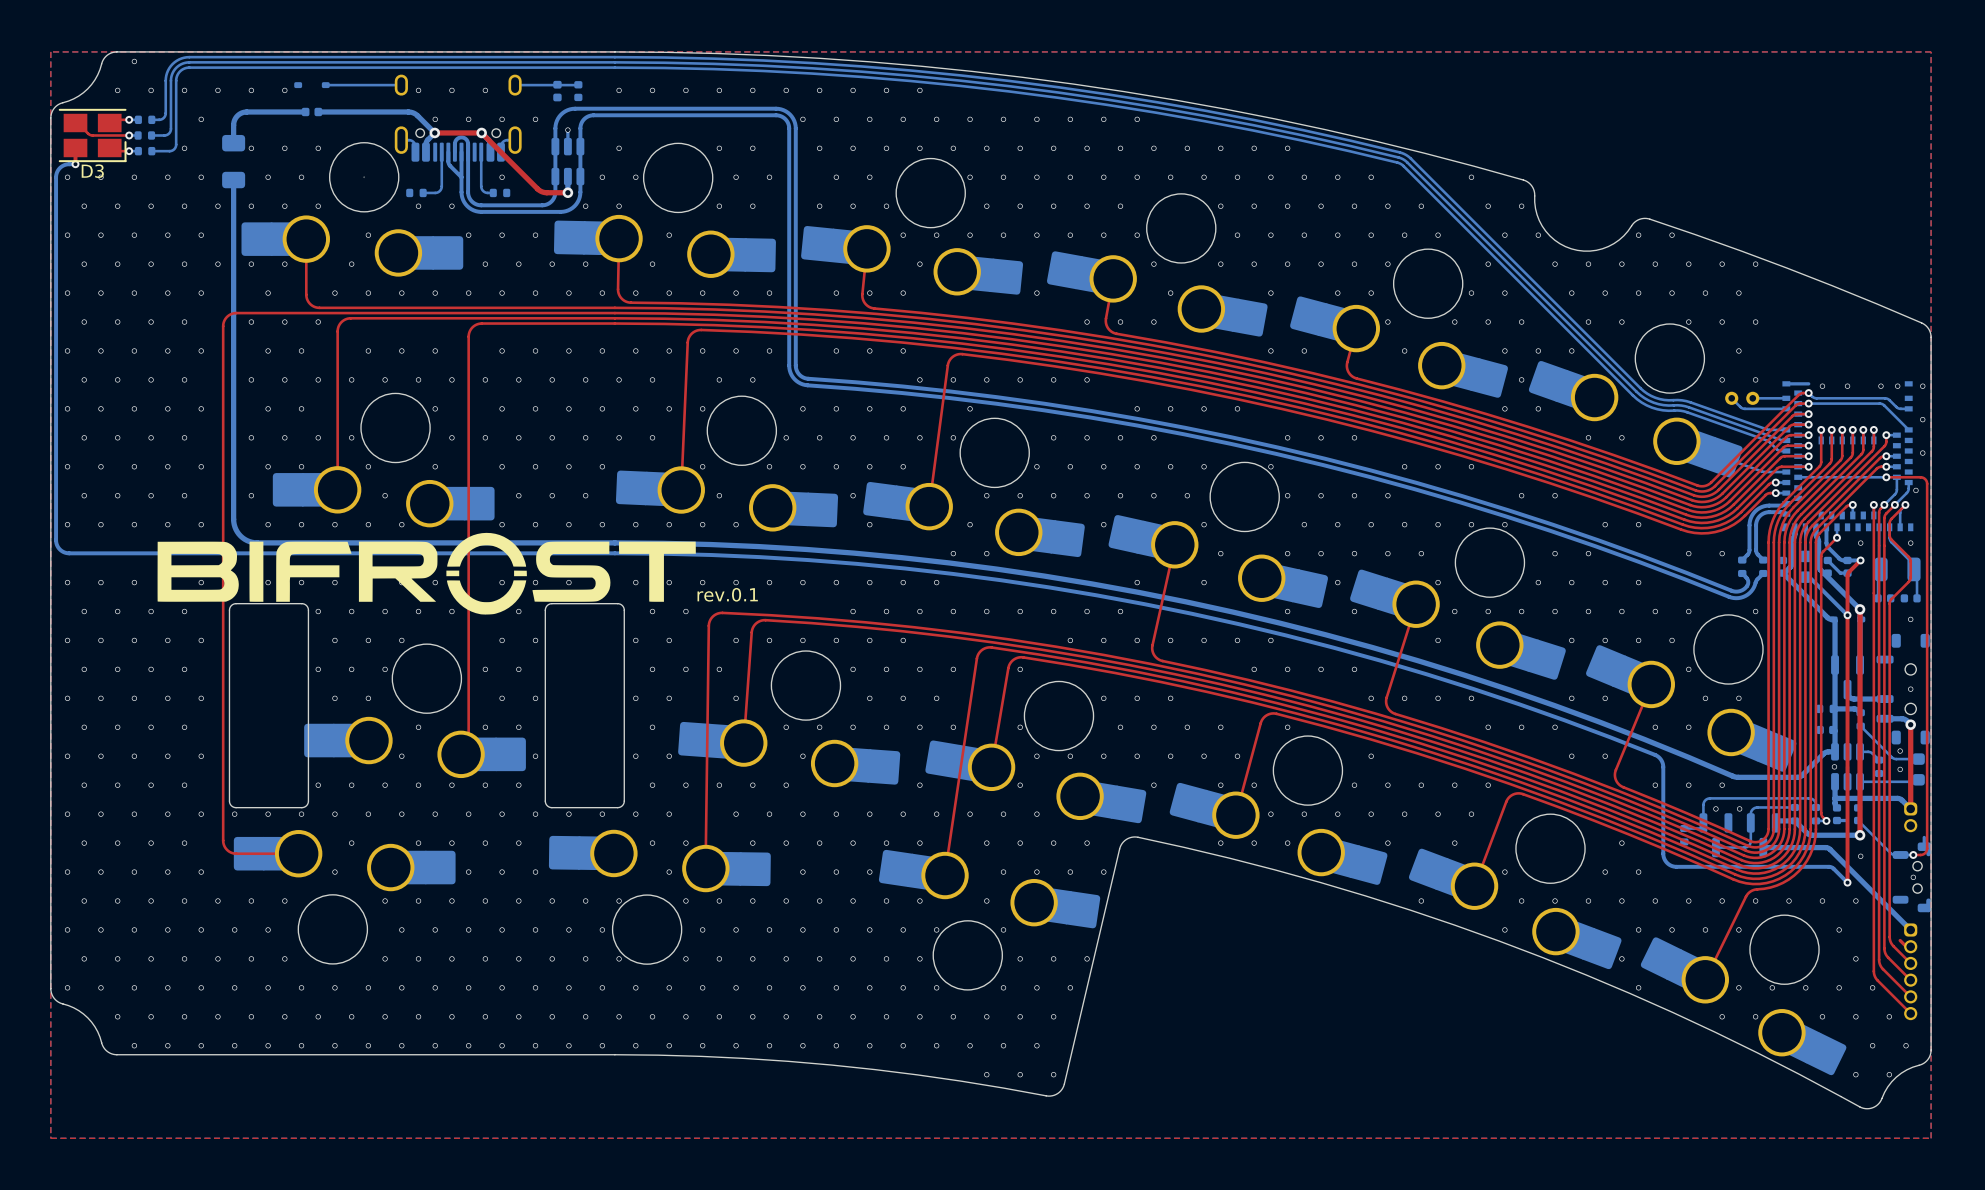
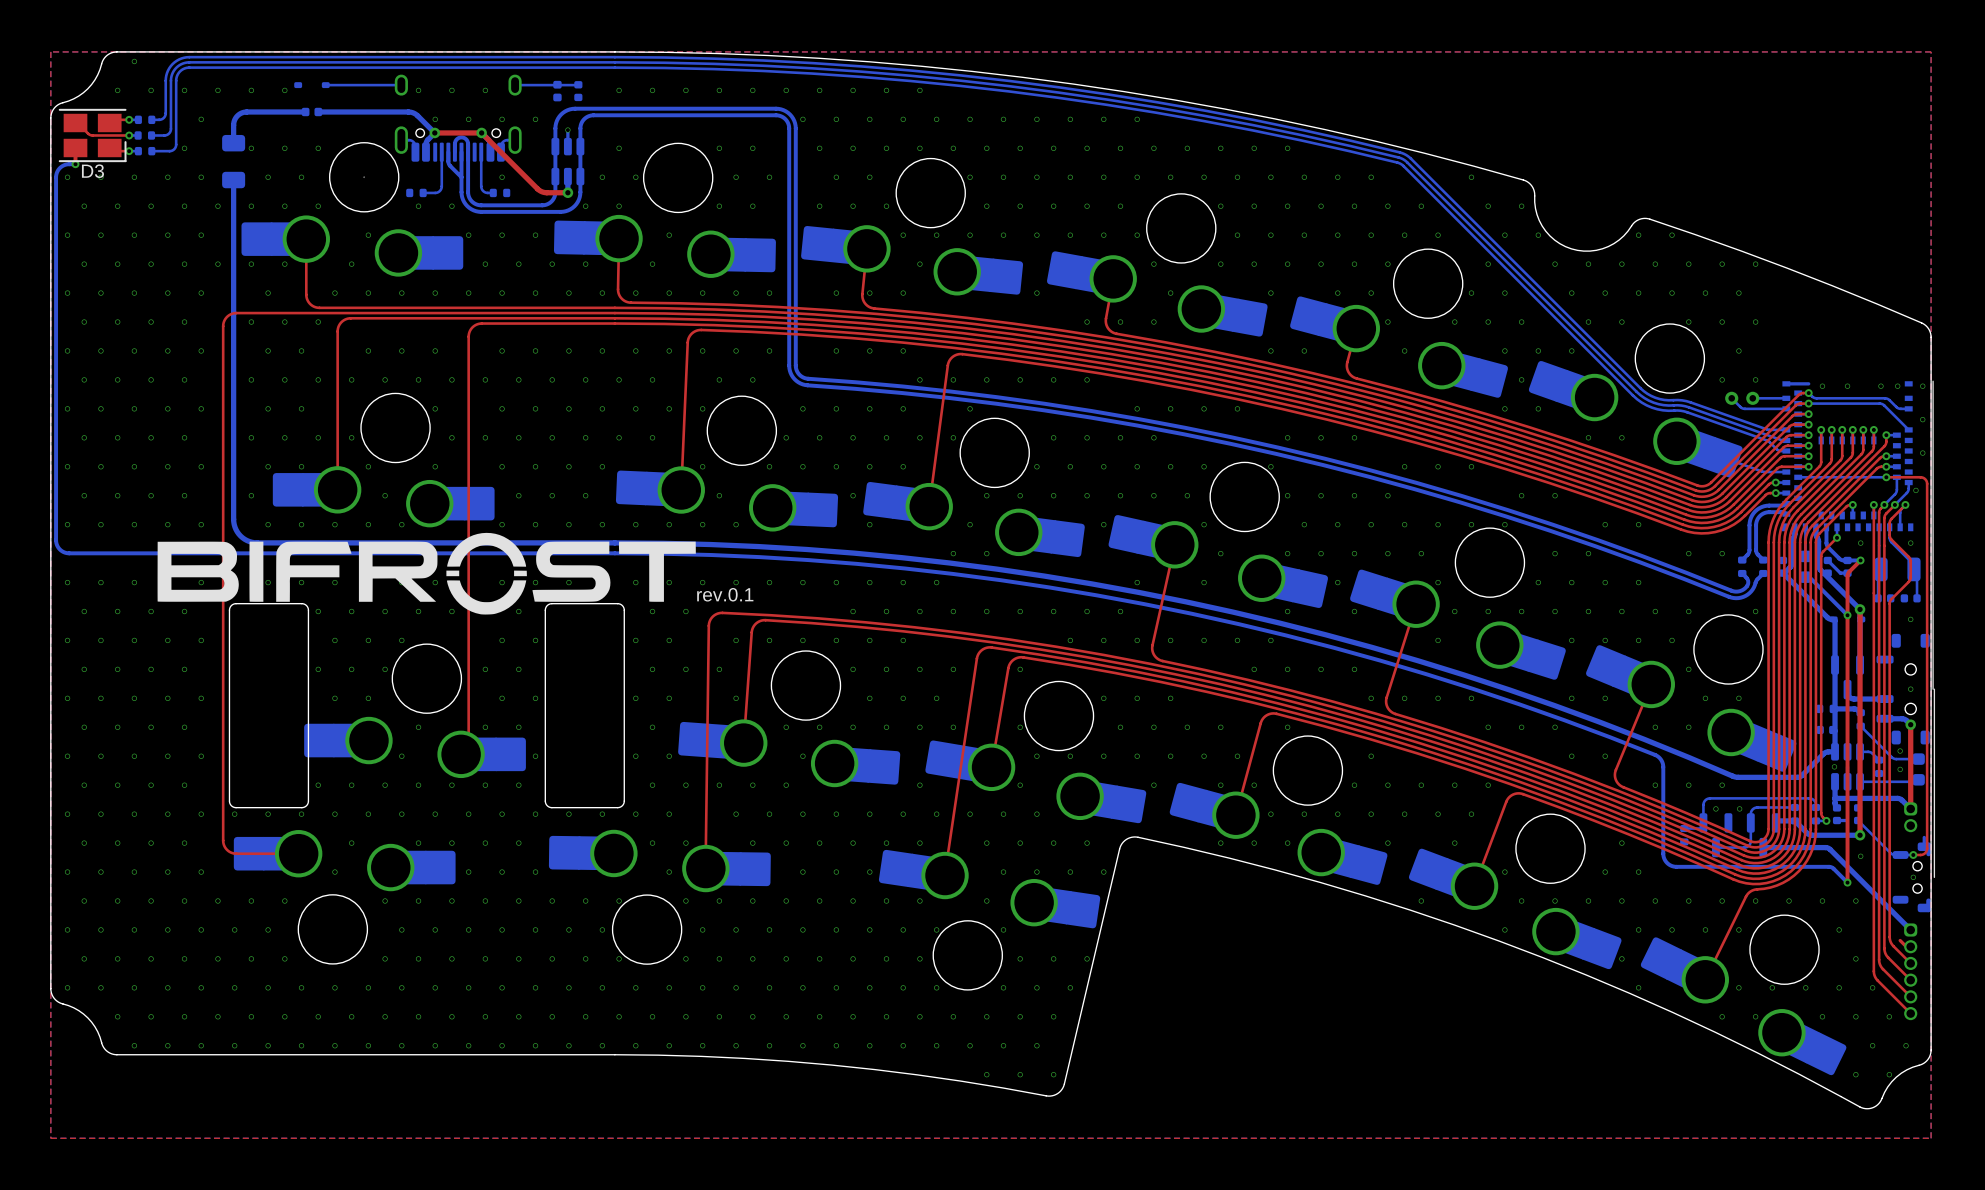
line: none -> (1933, 381) (1933, 689)
line: none -> (1934, 689) (1934, 877)

